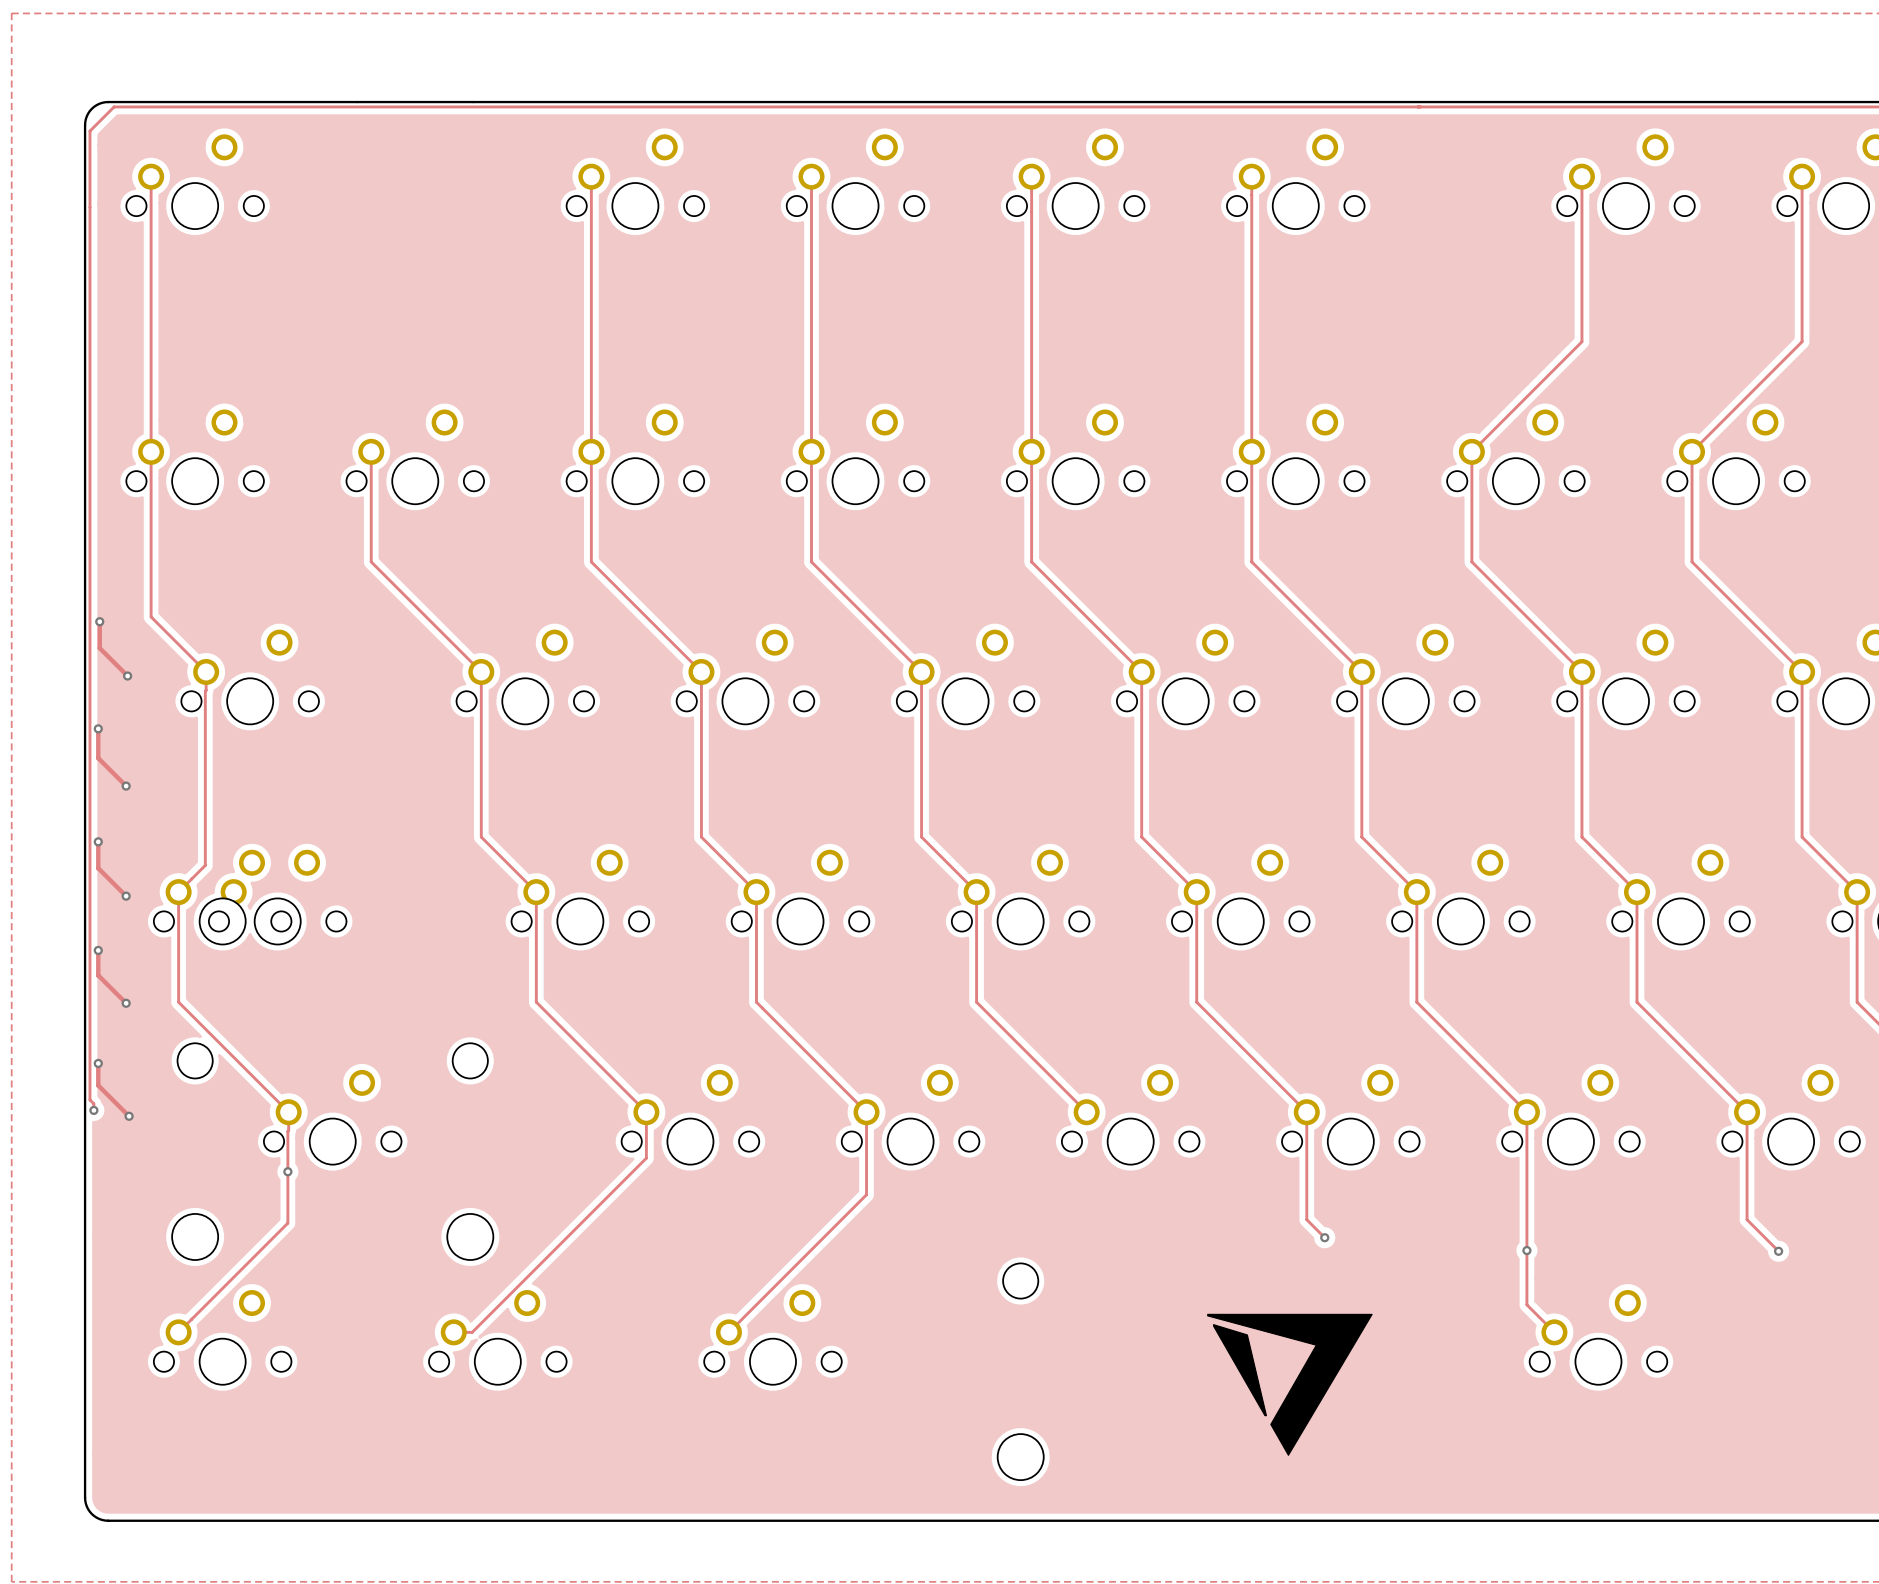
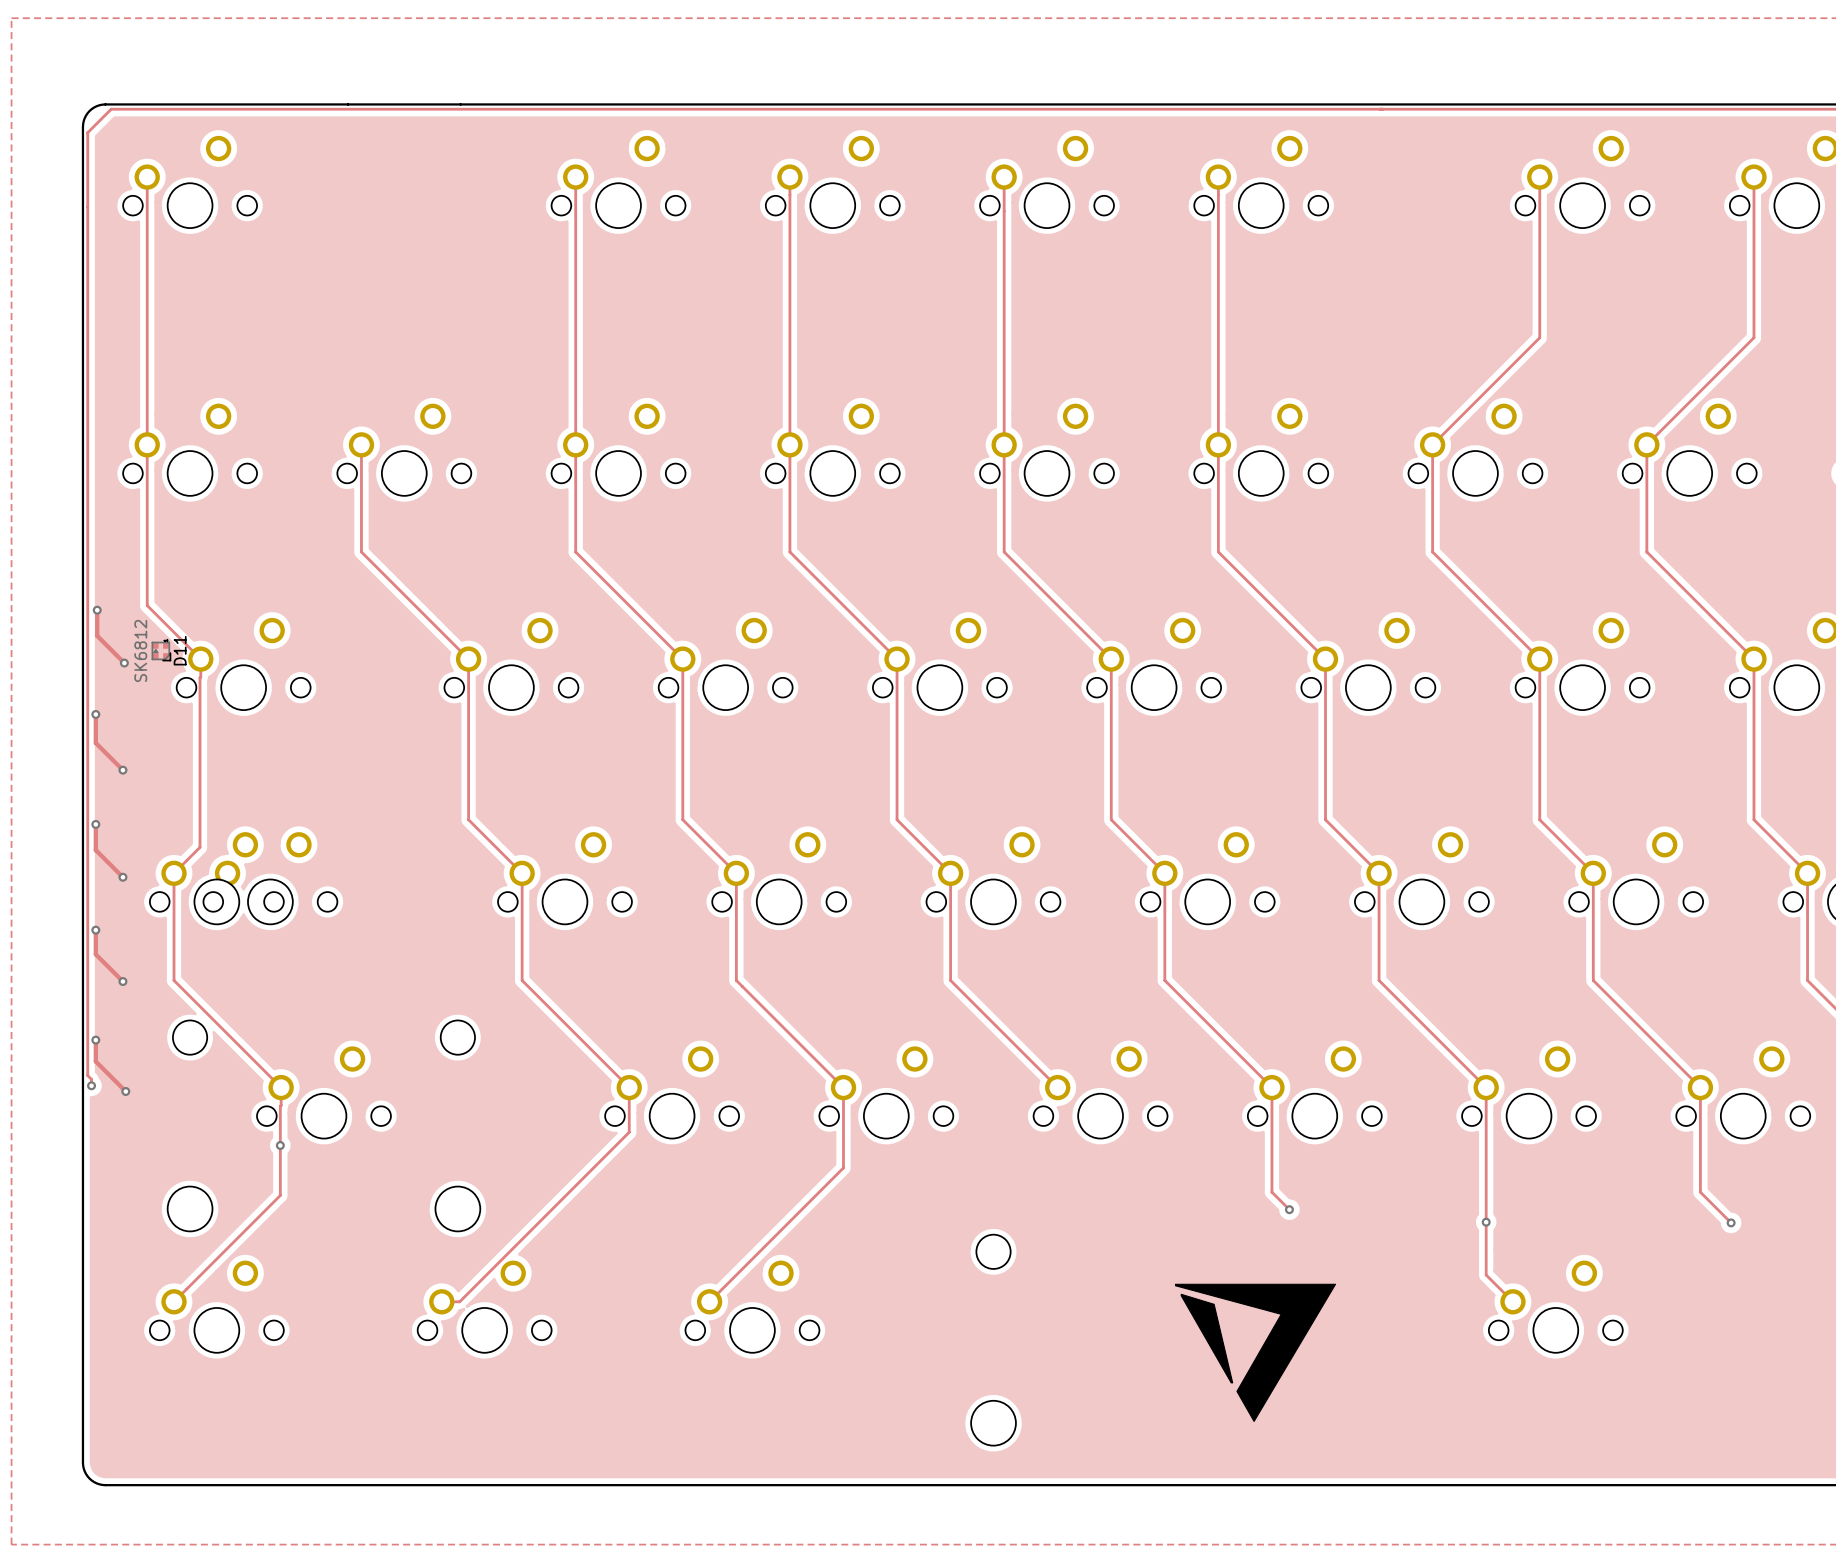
D11: none -> SK6812 (161, 651)

